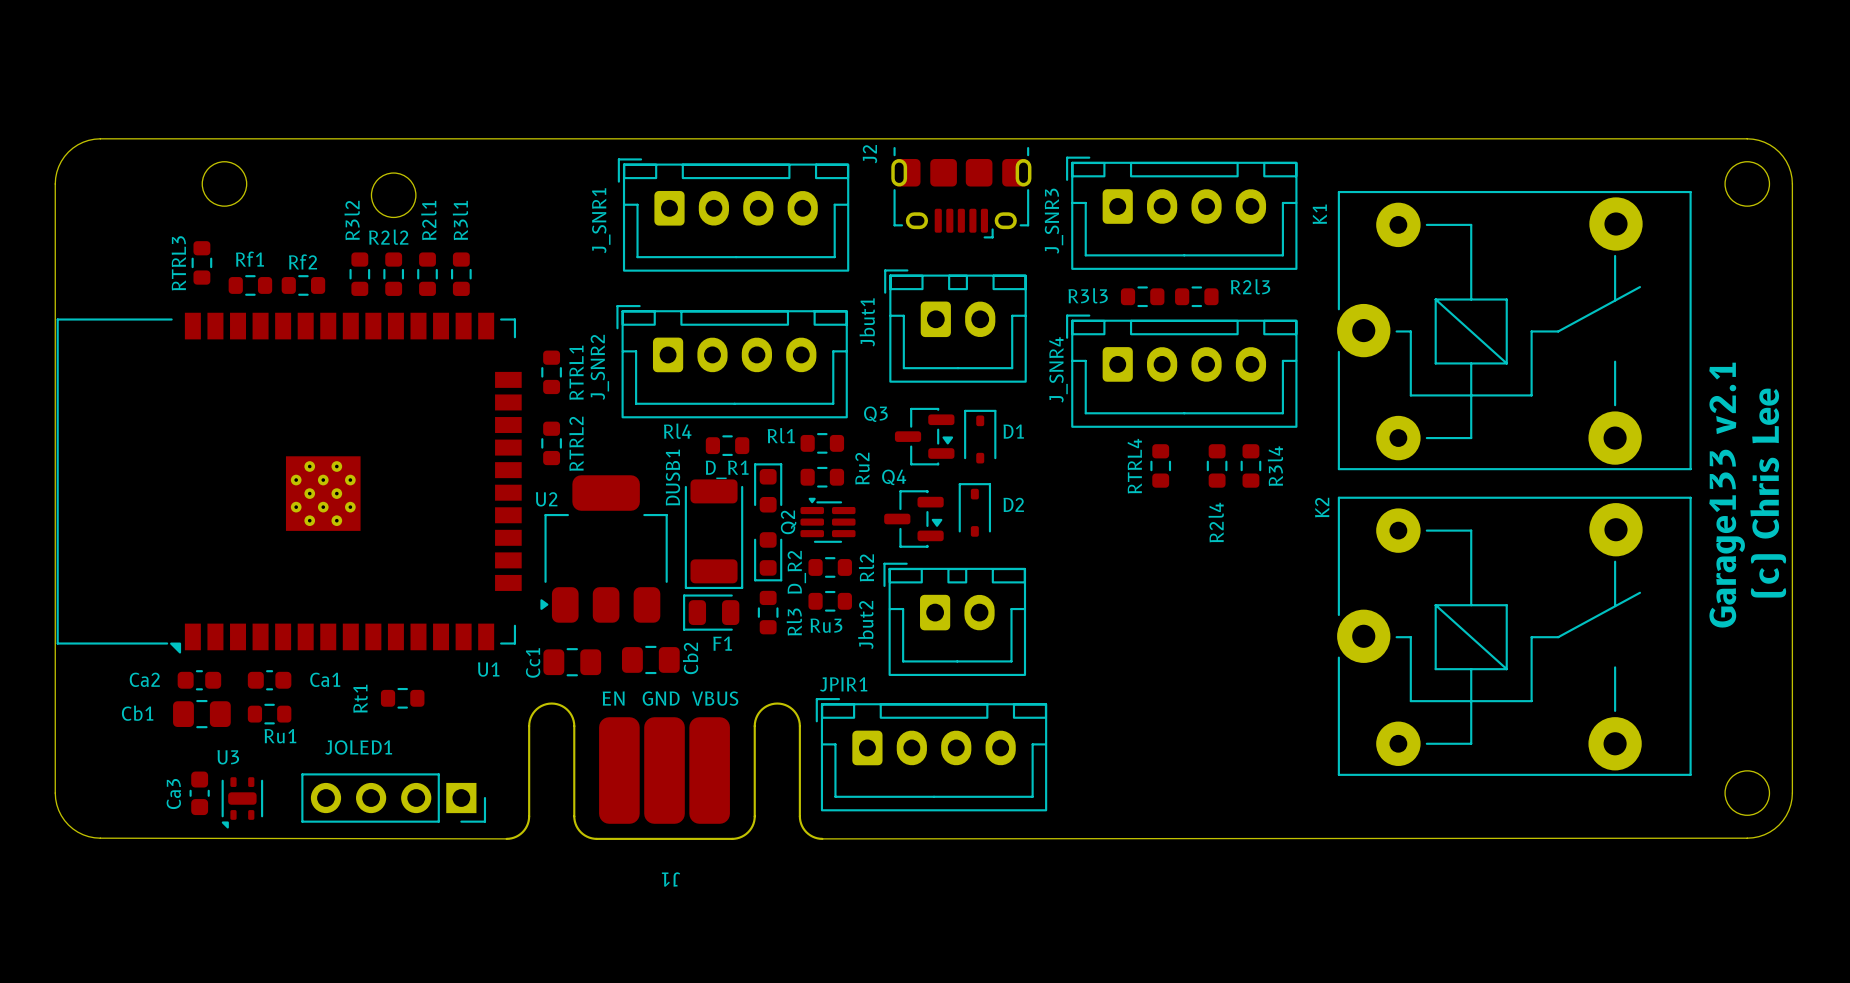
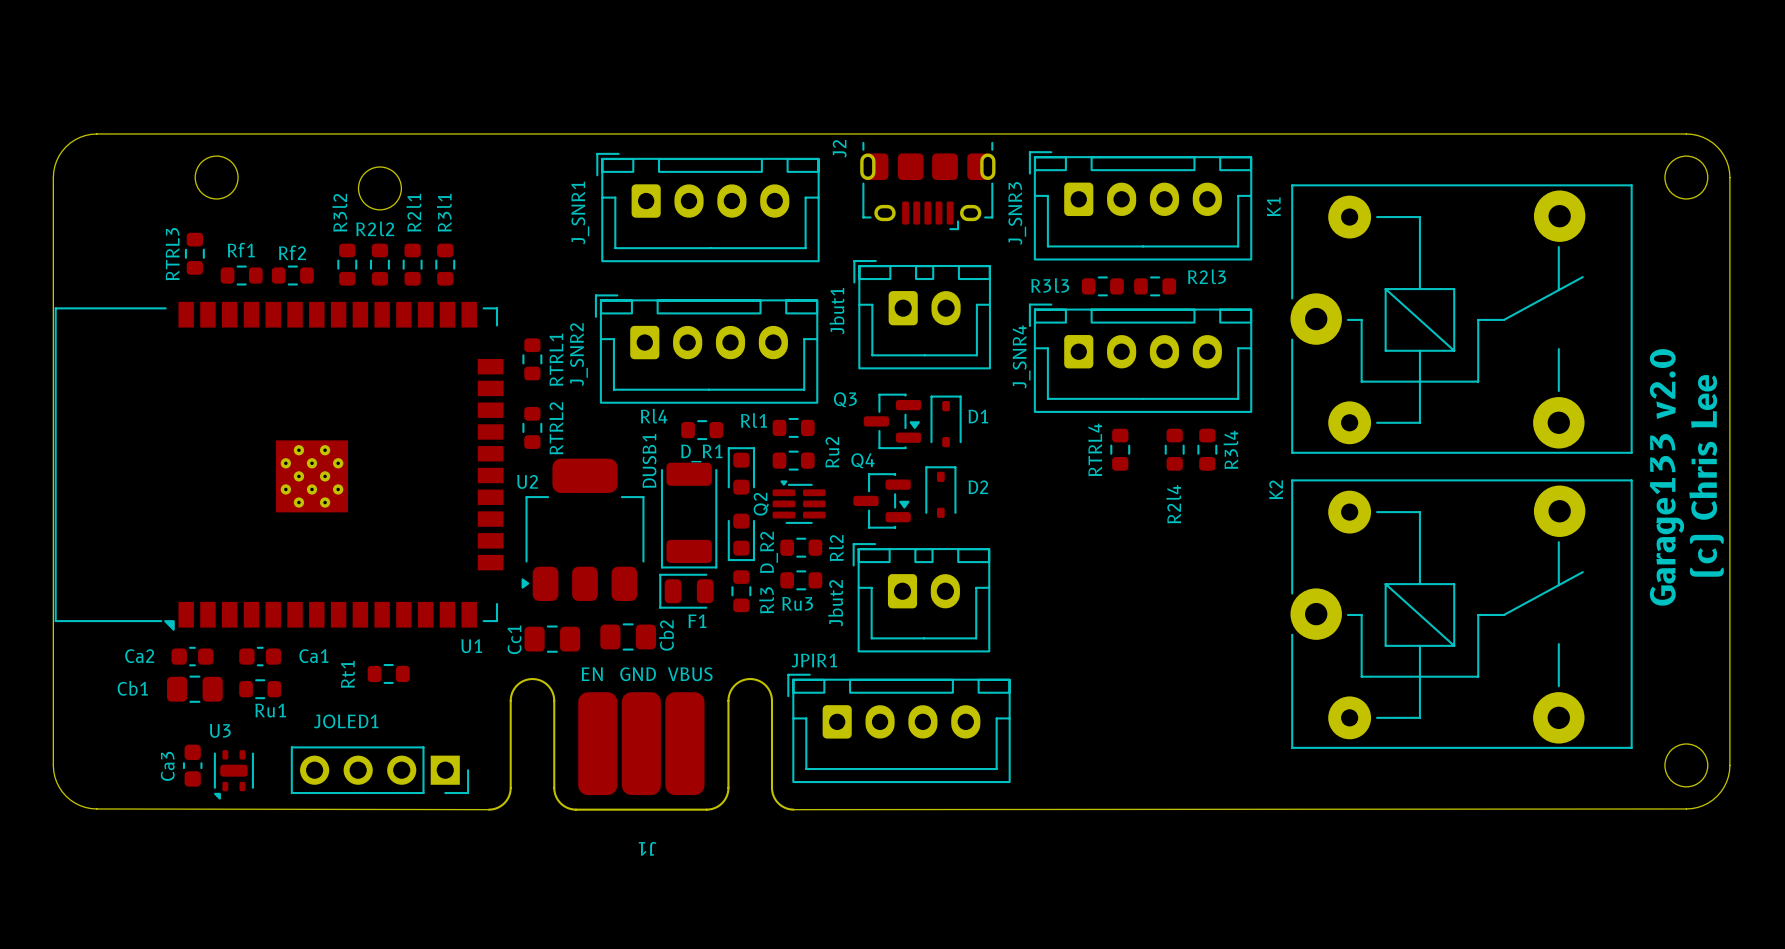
text: Garage133 v2.1 (1727, 495) -> Garage133 v2.0 (1666, 477)

